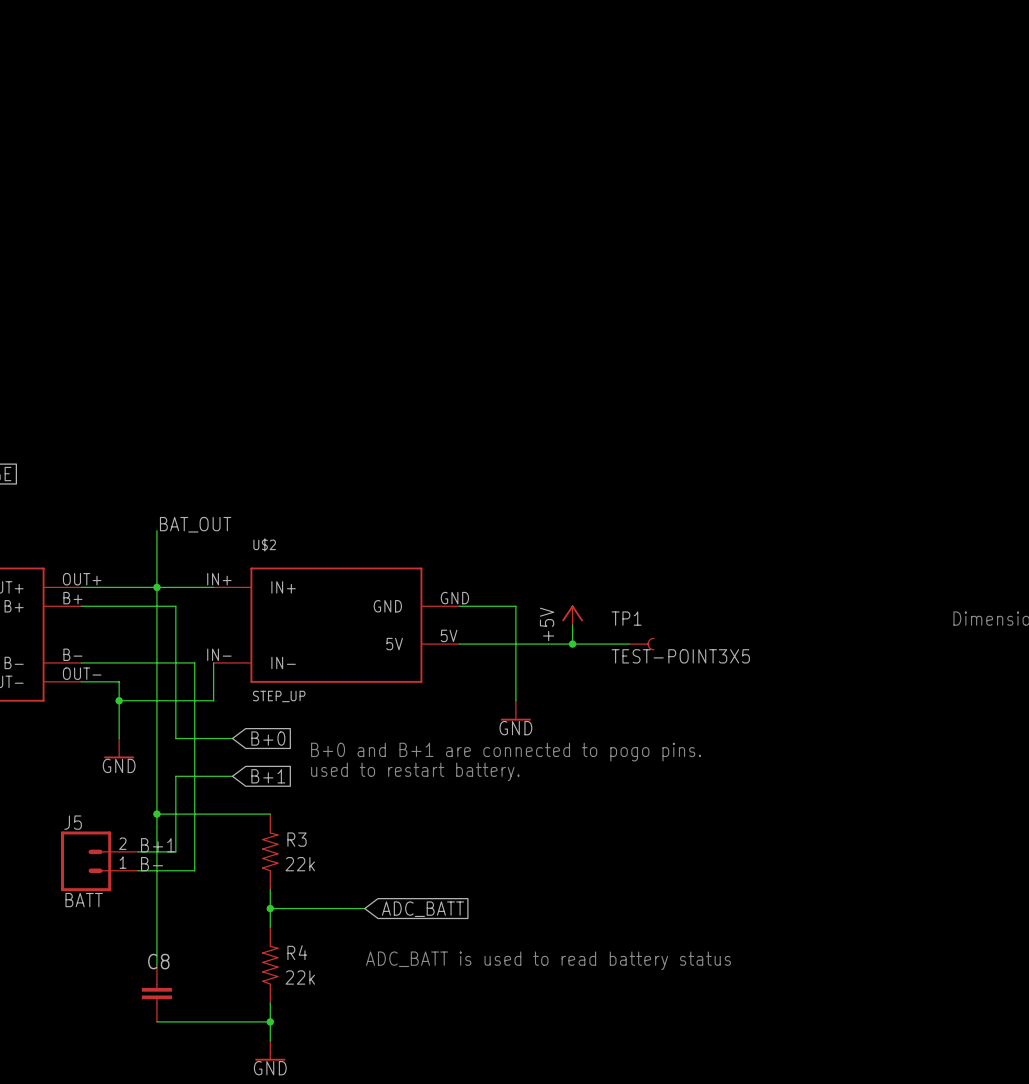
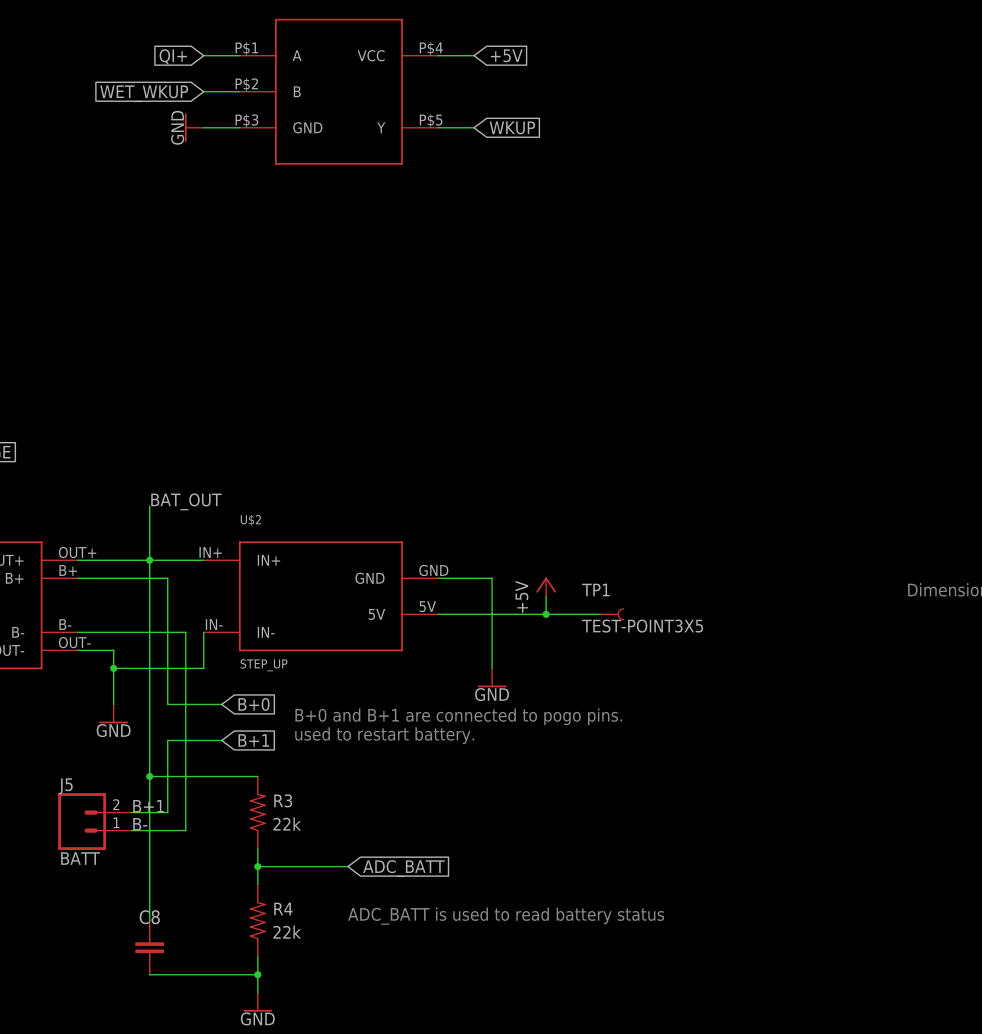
wire: none -> (203, 55) (239, 55)
wire: none -> (438, 55) (474, 55)
global label: none -> +5V (506, 55)
global label: none -> QI+ (173, 56)
global label: none -> WET_WKUP (144, 93)
wire: none -> (203, 91) (239, 91)
part: none -> (338, 91)
power symbol: none -> GND (194, 127)
wire: none -> (203, 127) (239, 127)
wire: none -> (438, 127) (474, 127)
global label: none -> WKUP (512, 127)

